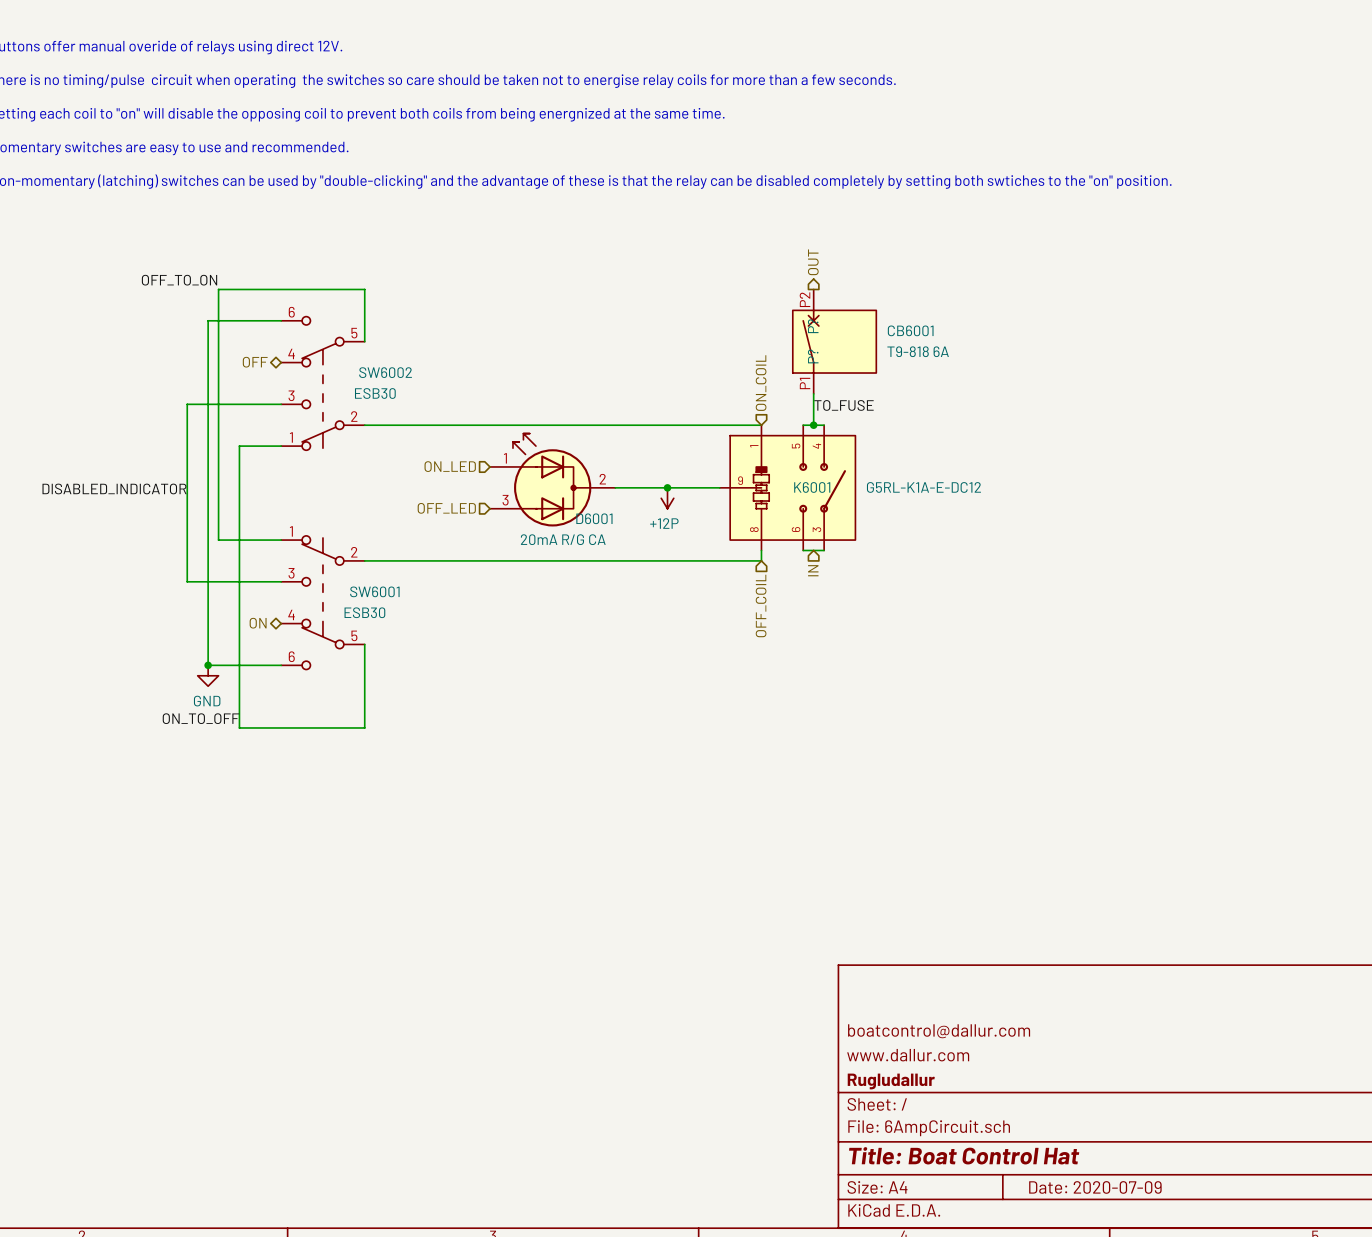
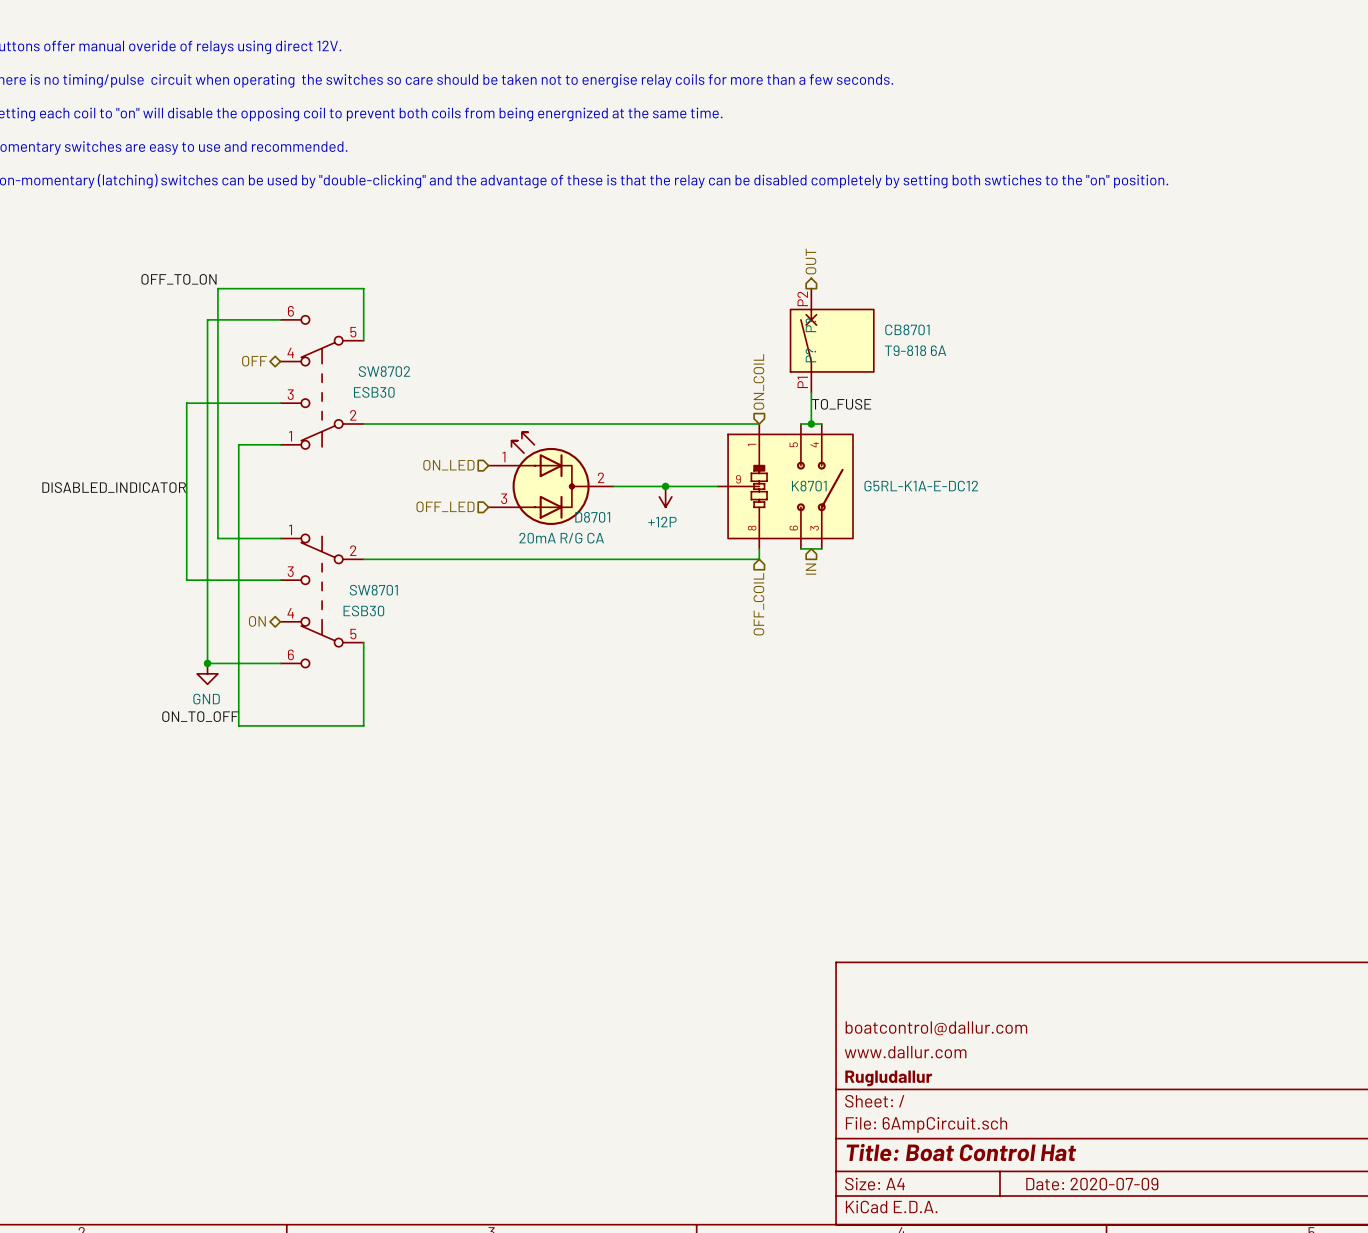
CB6001 name: CB6001 (910, 330) -> CB8701 (907, 329)
SW6002 name: SW6002 (385, 372) -> SW8702 (384, 371)
K6001 name: K6001 (812, 487) -> K8701 (809, 486)
D6001 name: D6001 (594, 518) -> D8701 (592, 517)
SW6001 name: SW6001 (374, 591) -> SW8701 (373, 590)

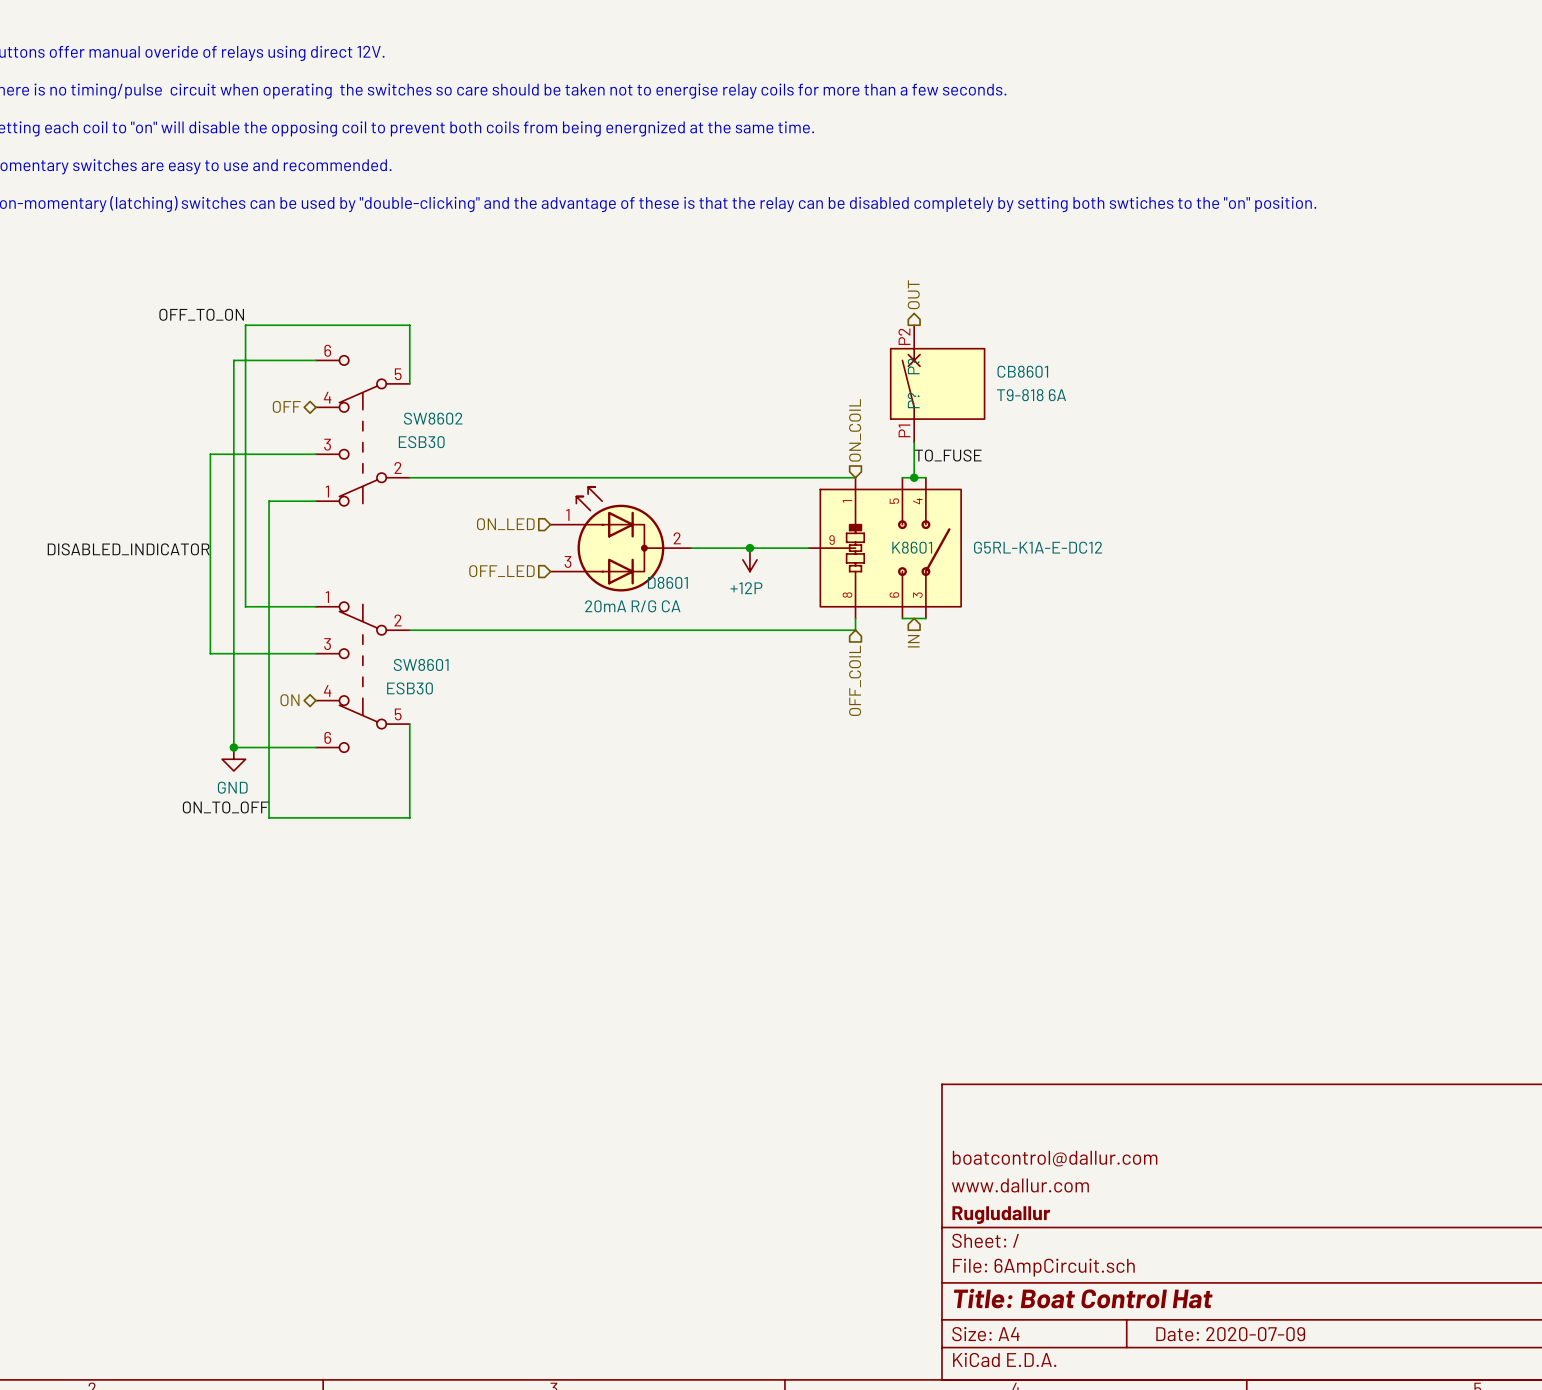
CB8701 name: CB8701 (907, 329) -> CB8601 (1022, 371)
SW8702 name: SW8702 (384, 371) -> SW8602 (433, 418)
K8701 name: K8701 (809, 486) -> K8601 (912, 547)
D8701 name: D8701 (592, 517) -> D8601 (667, 582)
SW8701 name: SW8701 (373, 590) -> SW8601 (421, 664)

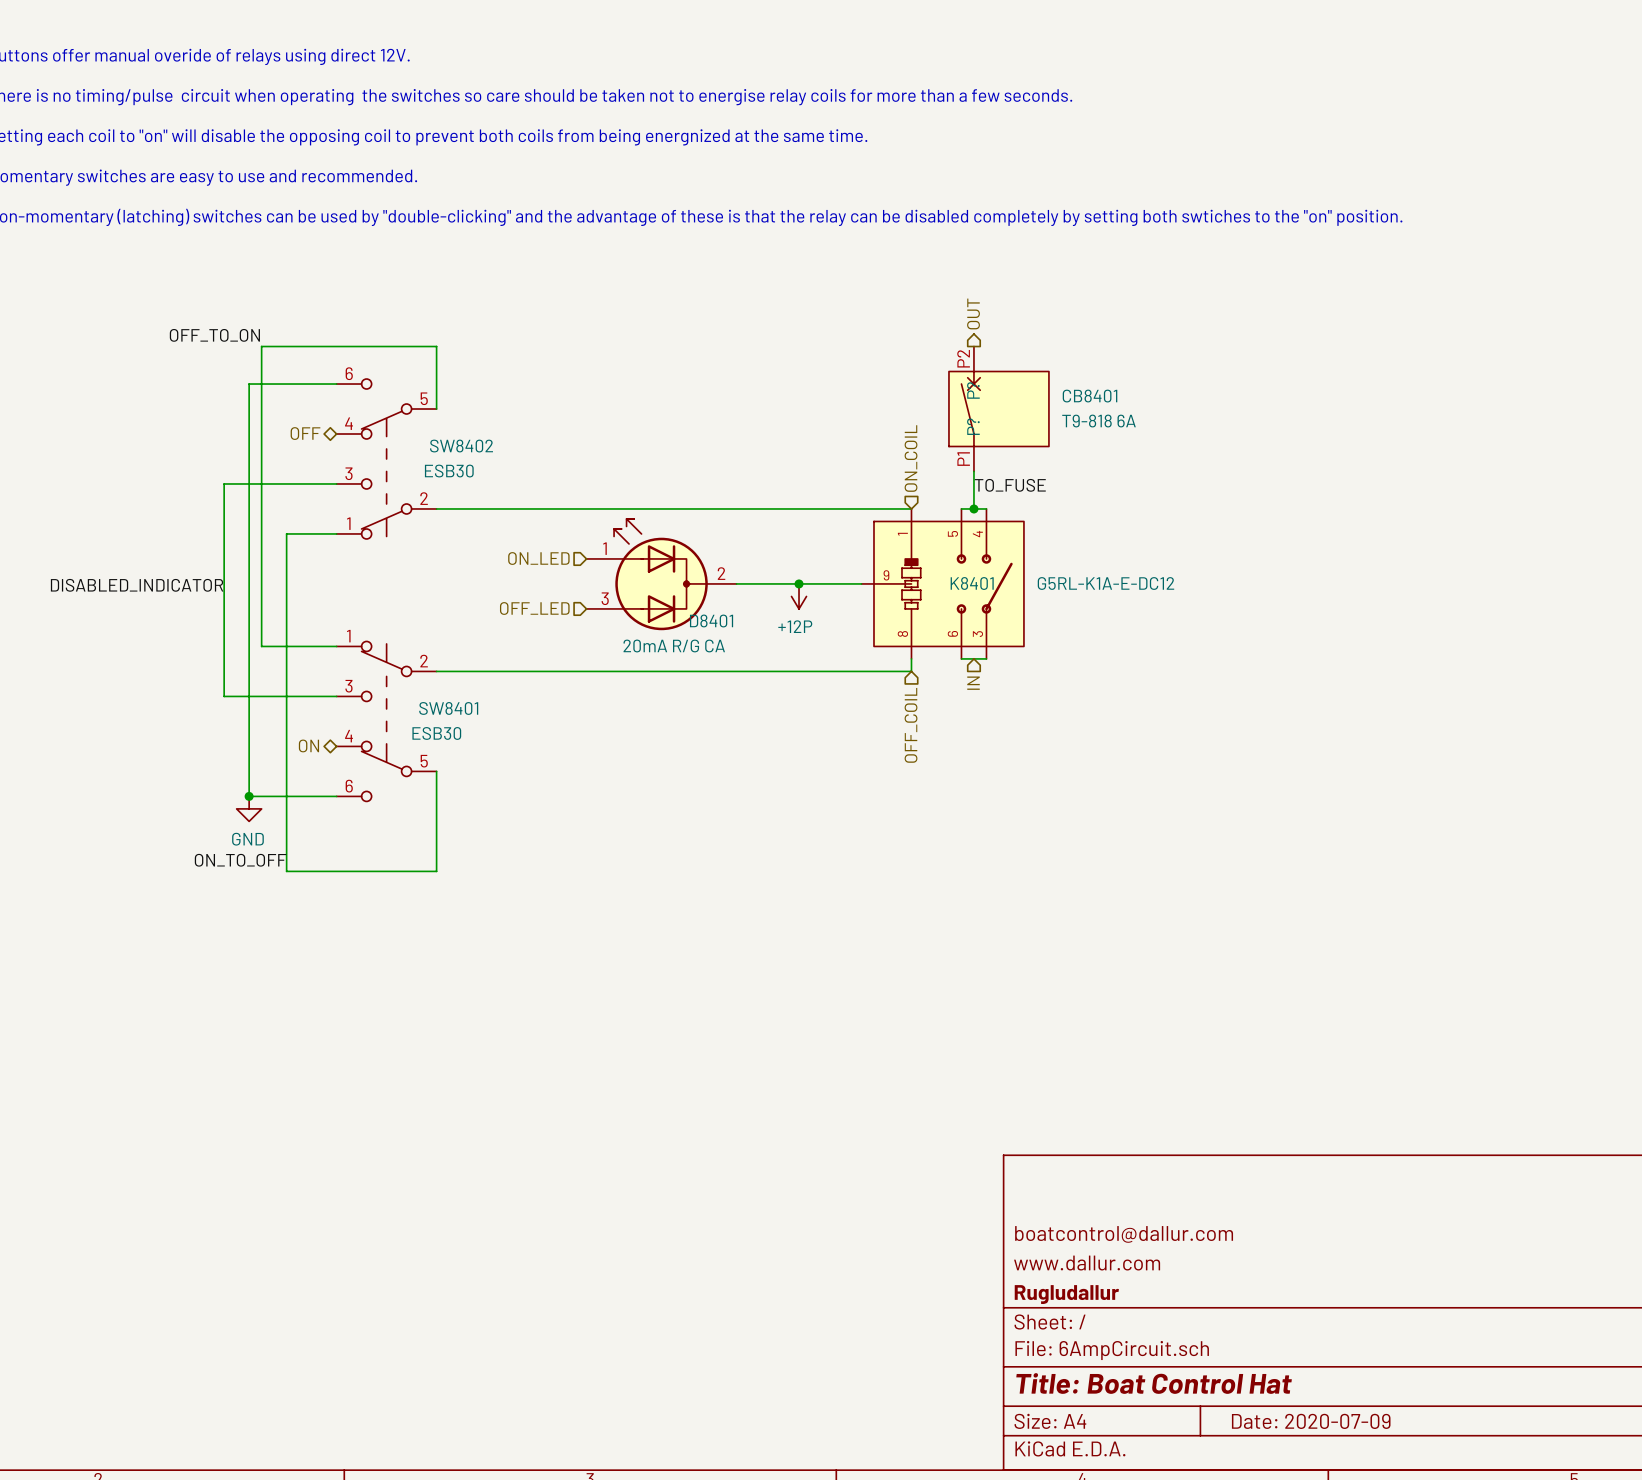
CB8601 name: CB8601 (1022, 371) -> CB8401 (1090, 396)
SW8602 name: SW8602 (433, 418) -> SW8402 (461, 446)
K8601 name: K8601 (912, 547) -> K8401 (972, 583)
D8601 name: D8601 (667, 582) -> D8401 (711, 620)
SW8601 name: SW8601 (421, 664) -> SW8401 (448, 708)

